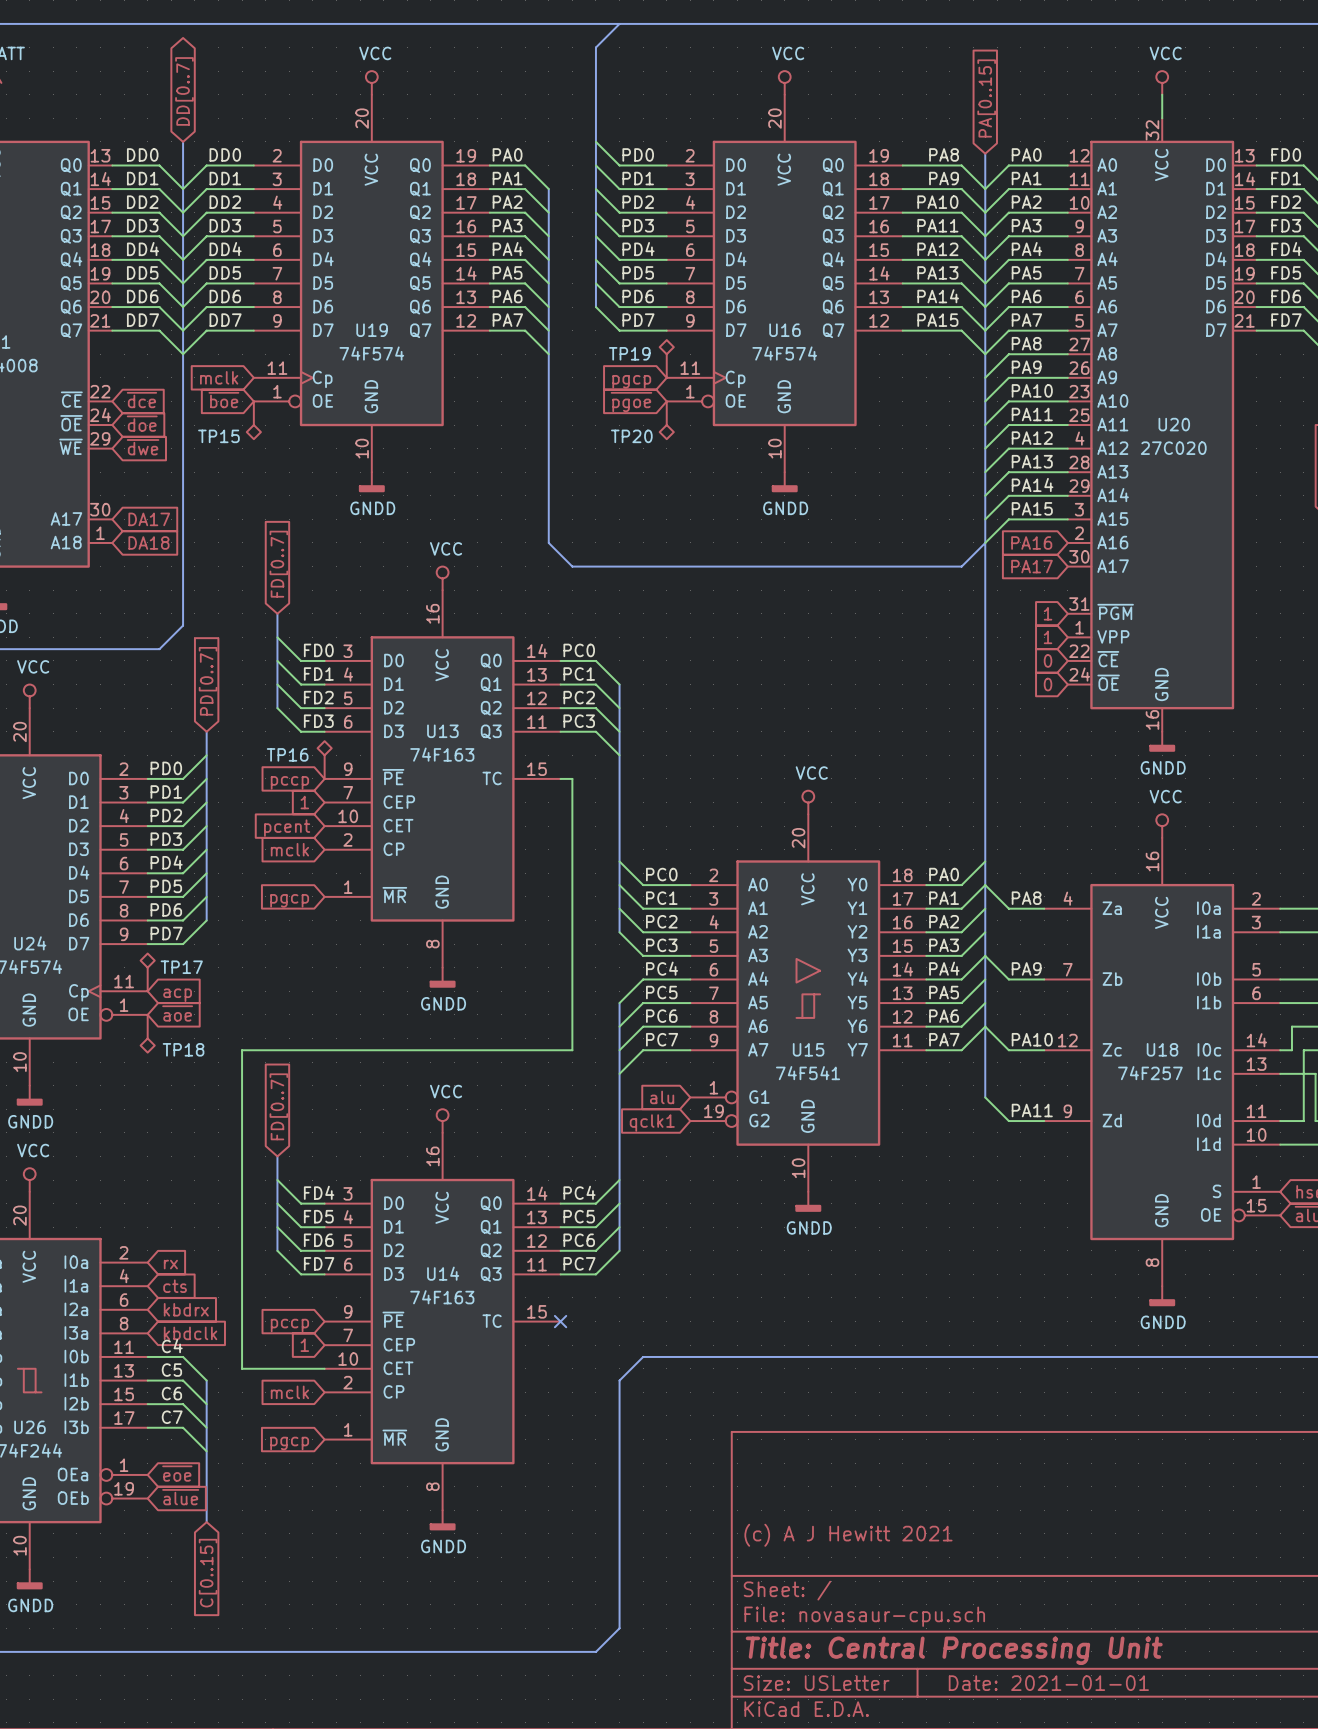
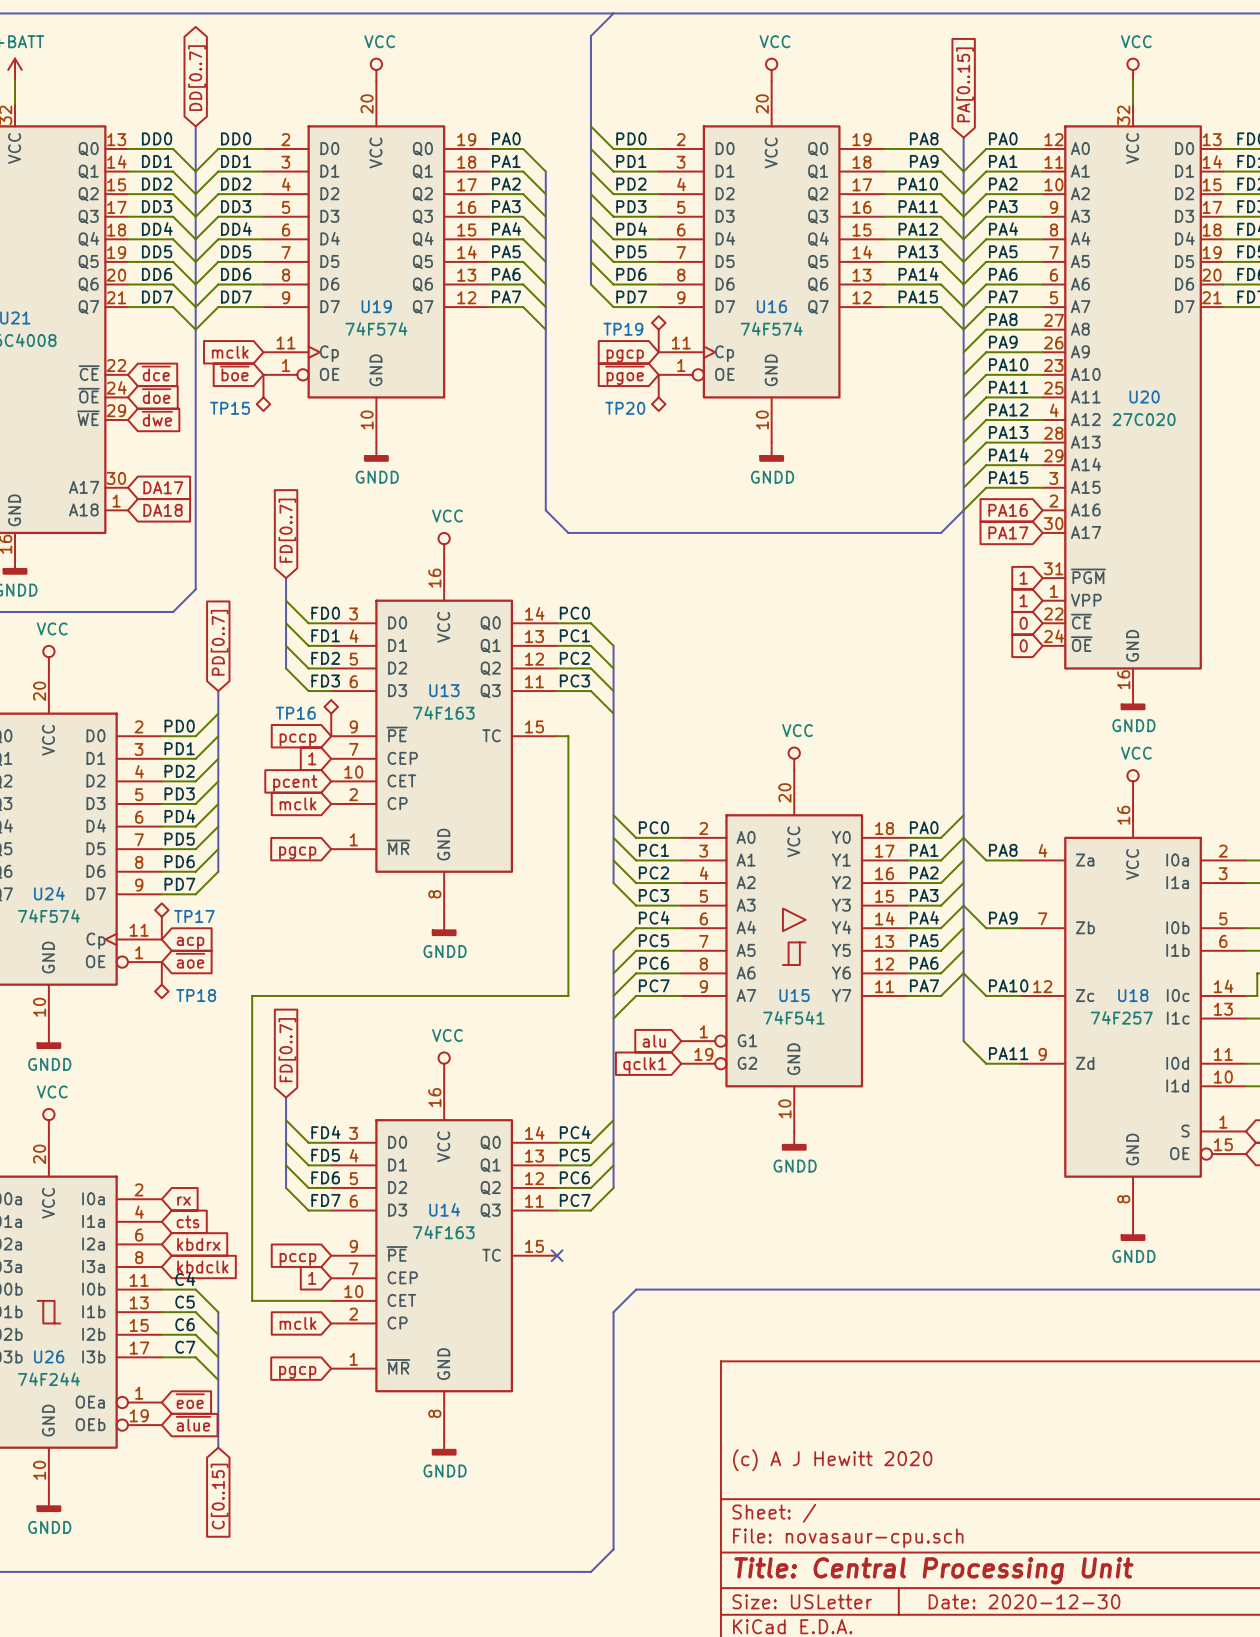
title block: (c) A J Hewitt 2021 (848, 1535) -> (c) A J Hewitt 2020 (832, 1460)
title block: Date: 2021-01-01 (1048, 1683) -> Date: 2020-12-30 (1024, 1601)

